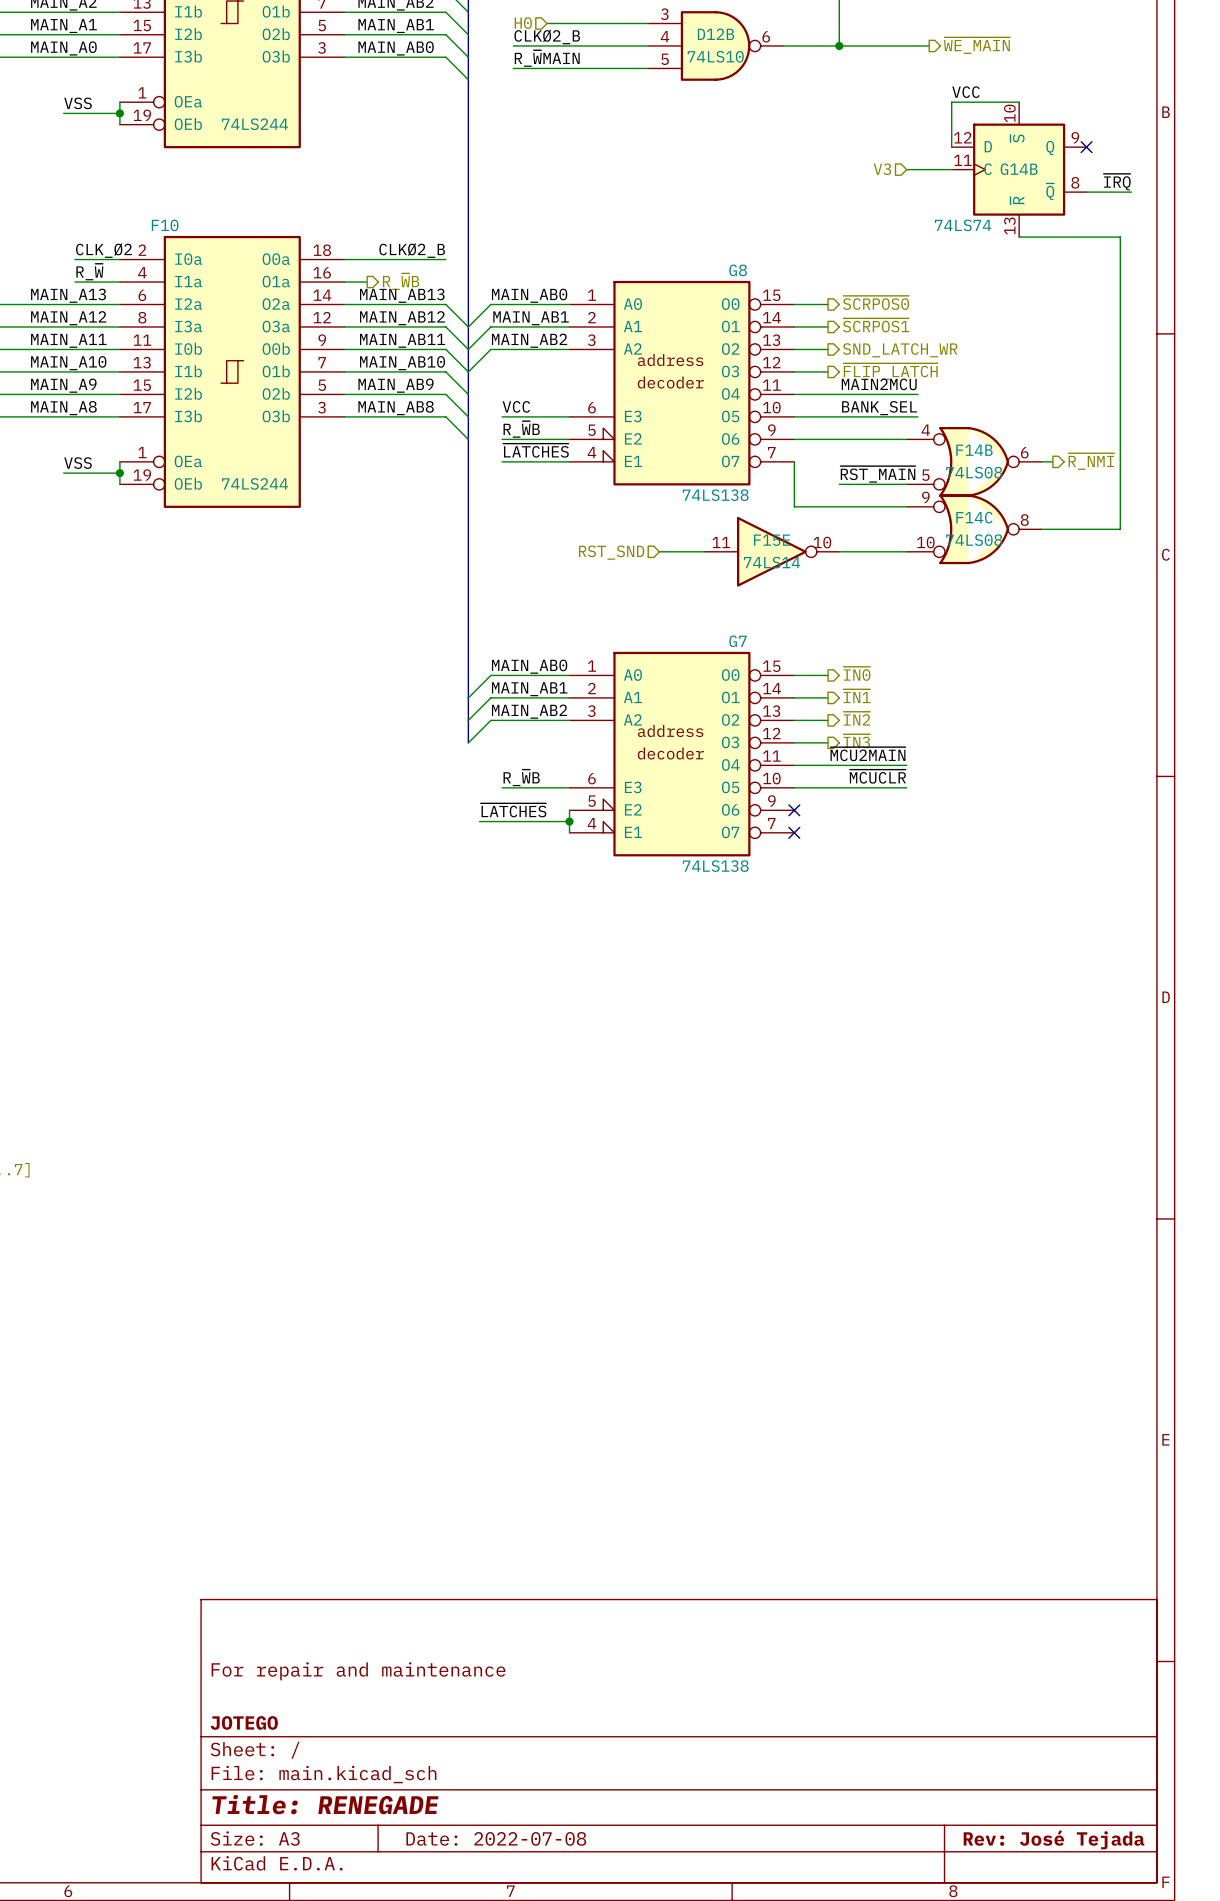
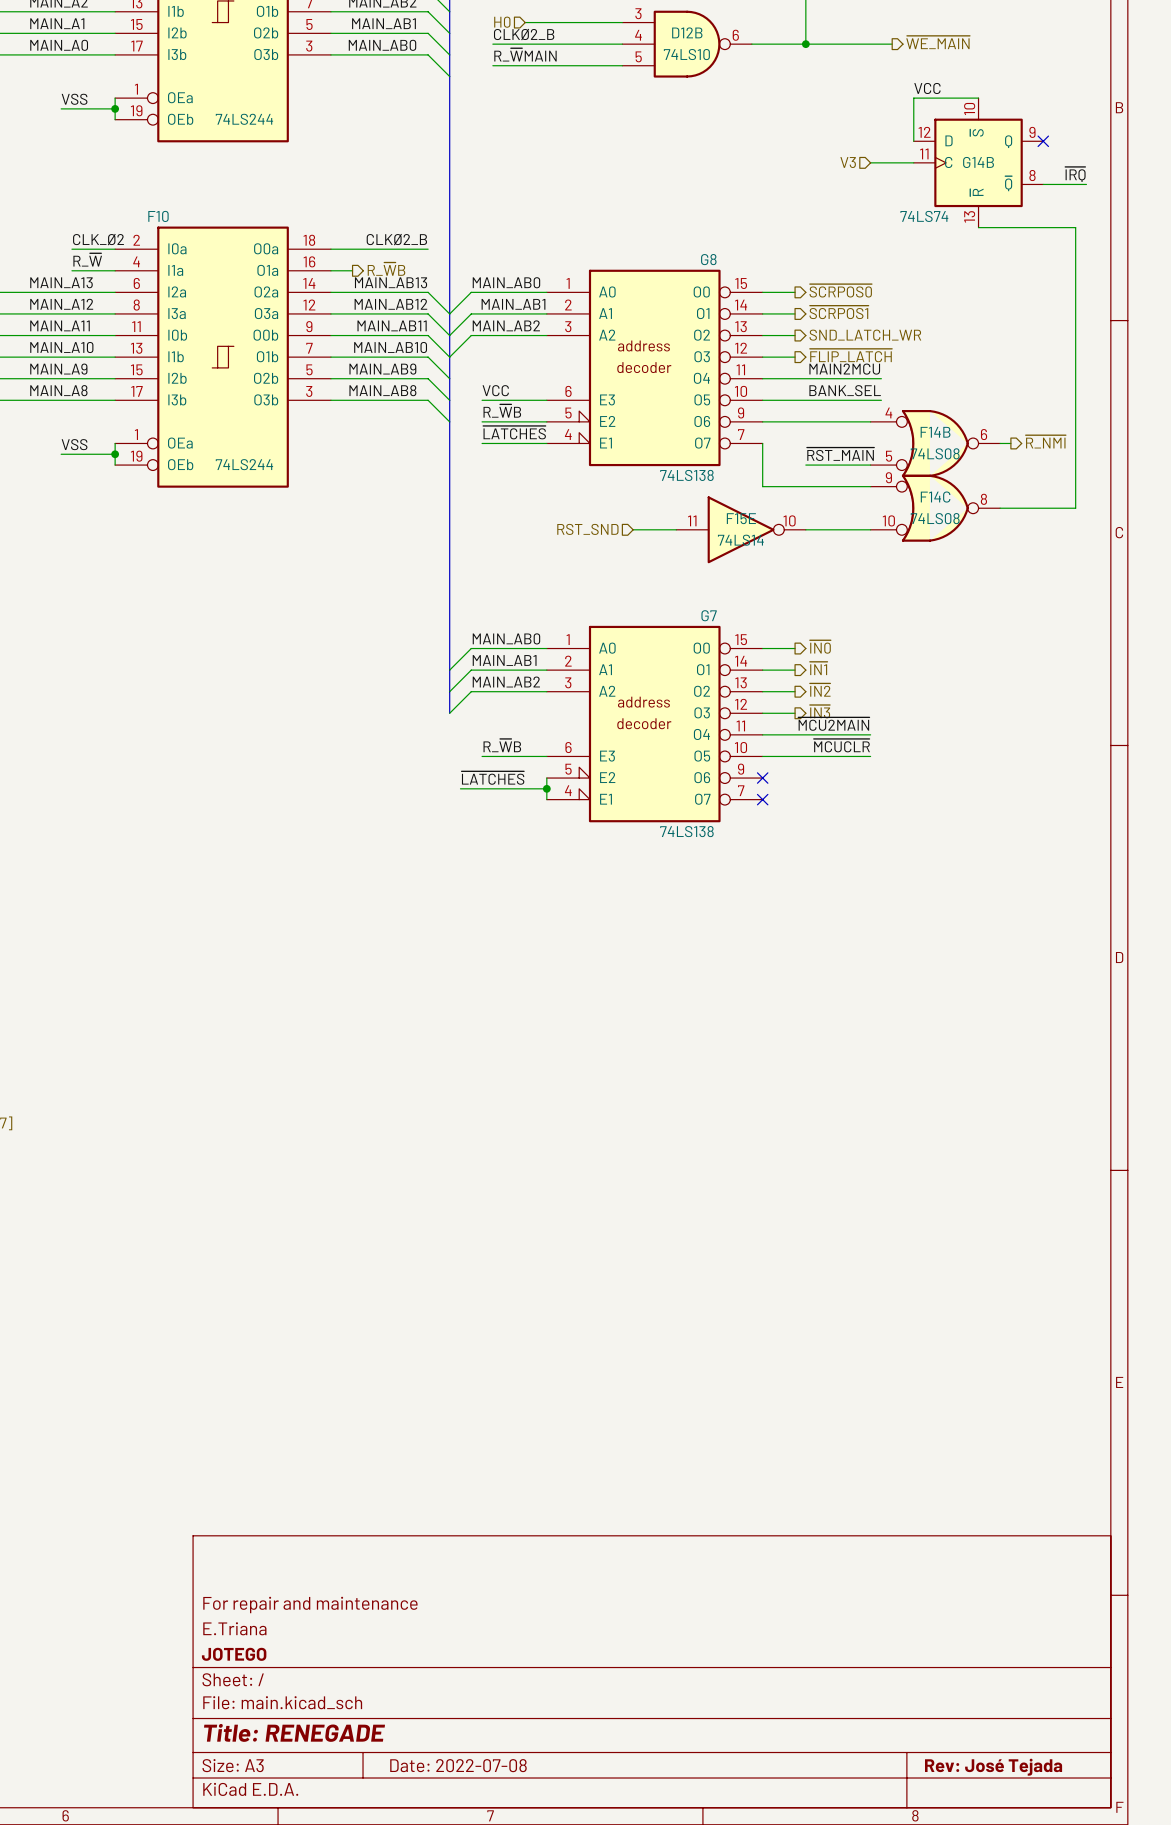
title block: none -> E.Triana (234, 1628)

